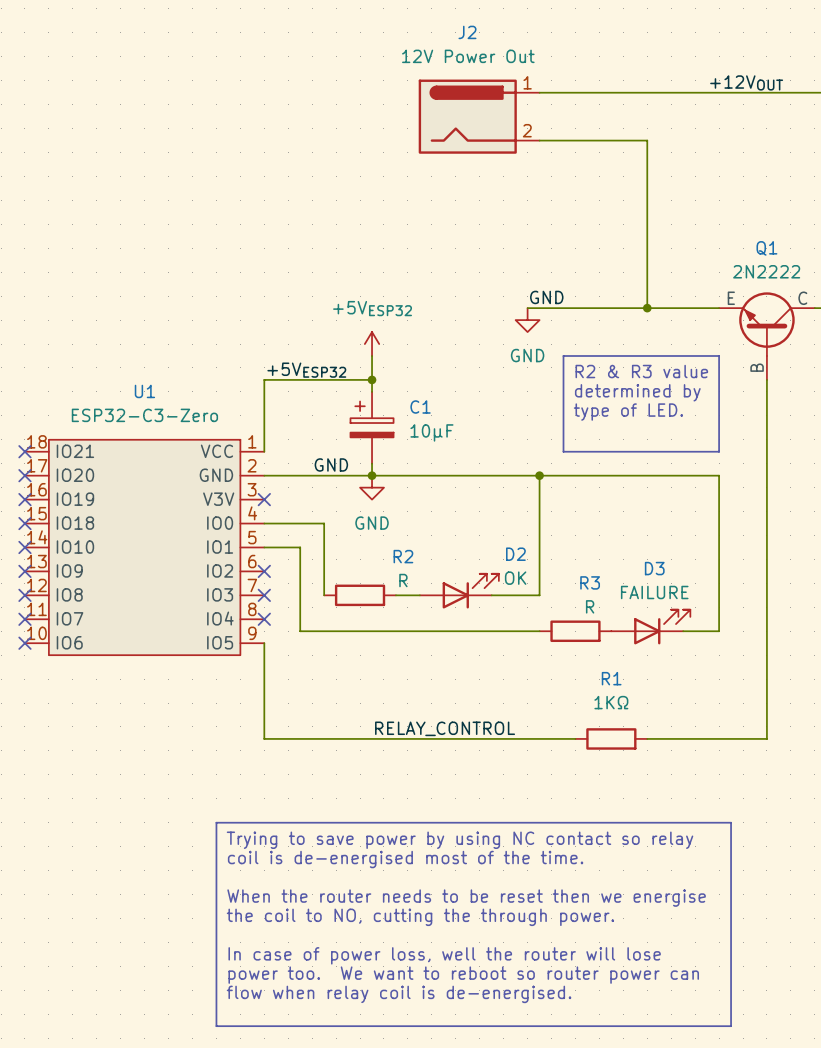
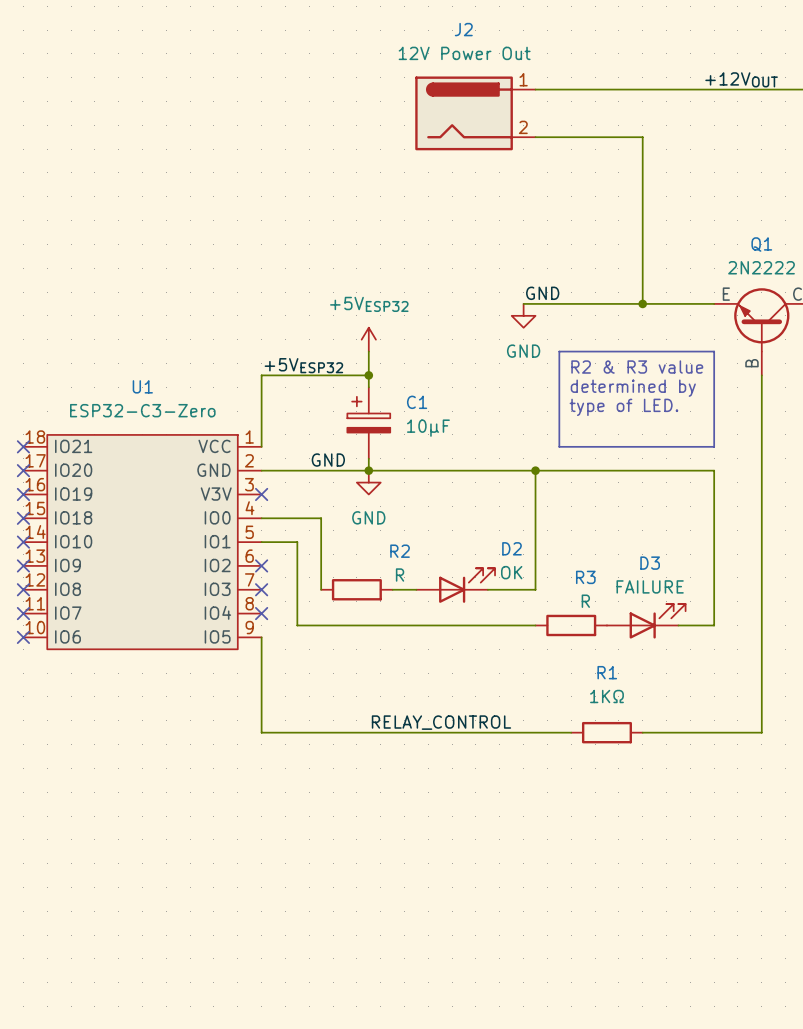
line: (216, 822) (731, 822) (731, 1026) (216, 1026) (216, 822) -> none
text: Trying to save power by using NC contact so relay (460, 840) -> none
text: coil is de-energised most of the time. (405, 859) -> none
text: When the router needs to be reset then we energise (466, 898) -> none
text: the coil to NO, cutting the through power. (420, 917) -> none
text: In case of power loss, well the router will lose (444, 955) -> none
text: power too. We want to reboot so router power can (463, 975) -> none
text: flow when relay coil is de-energised. (399, 994) -> none

